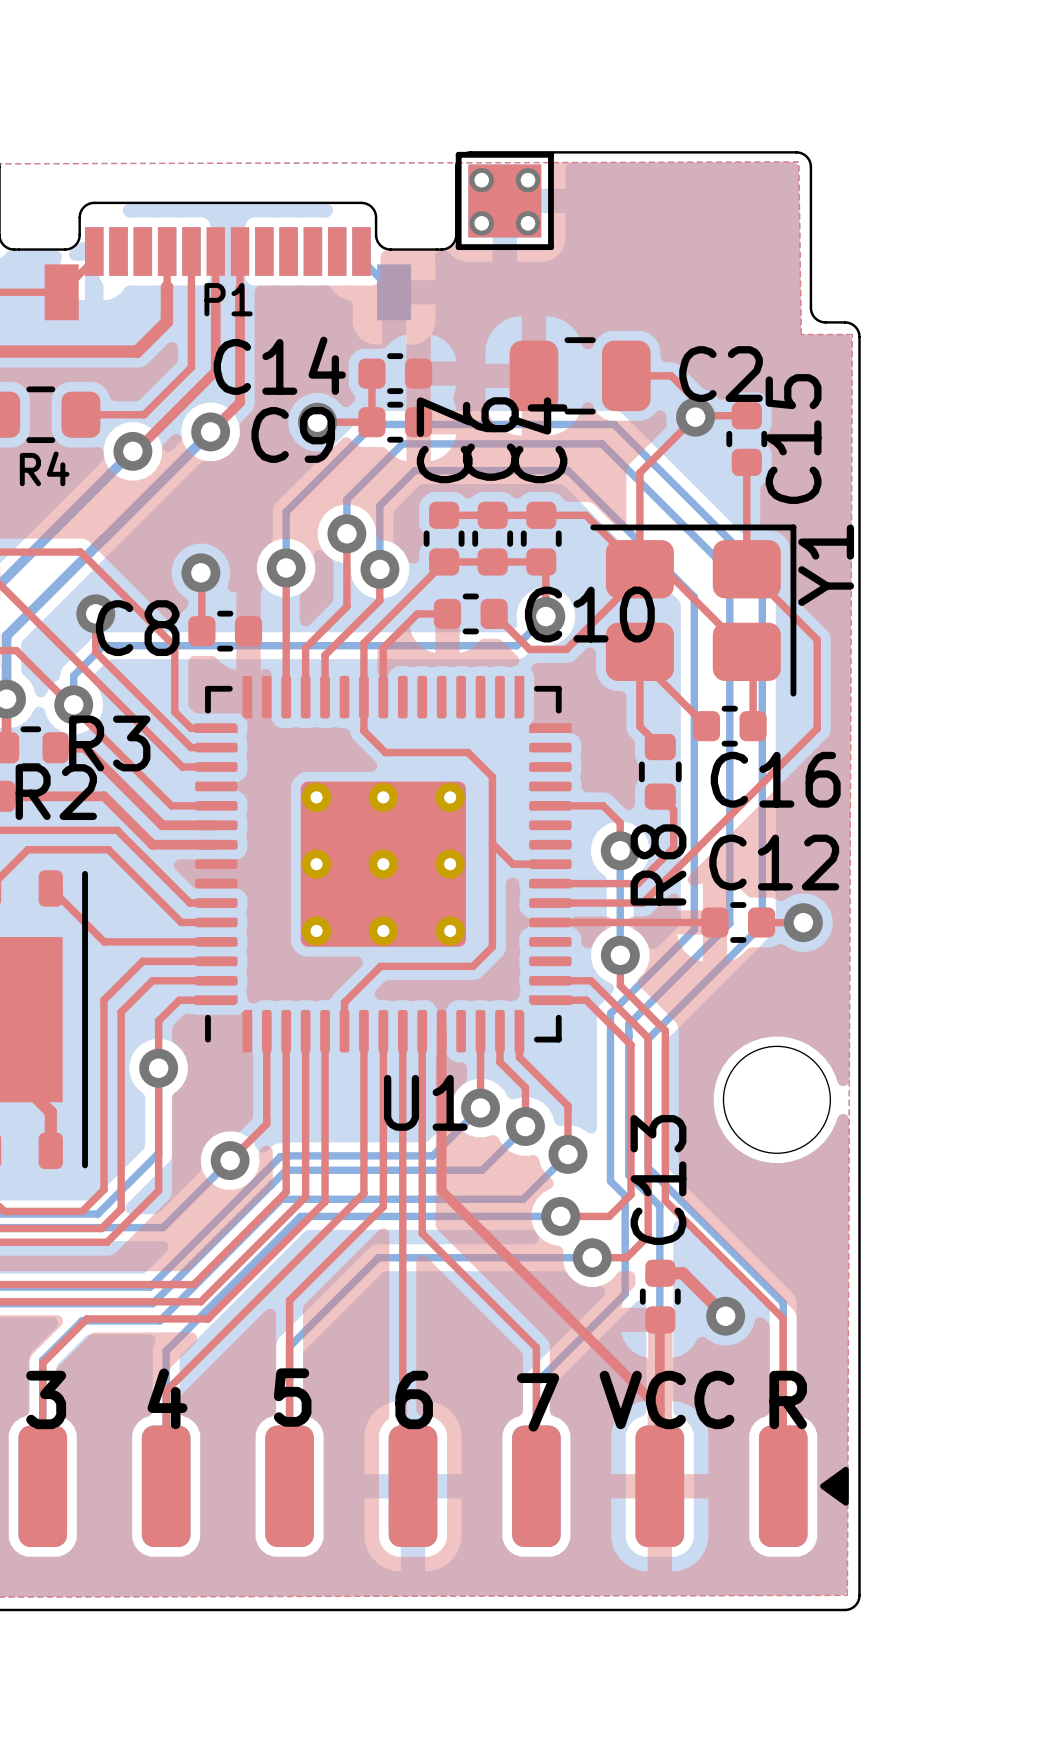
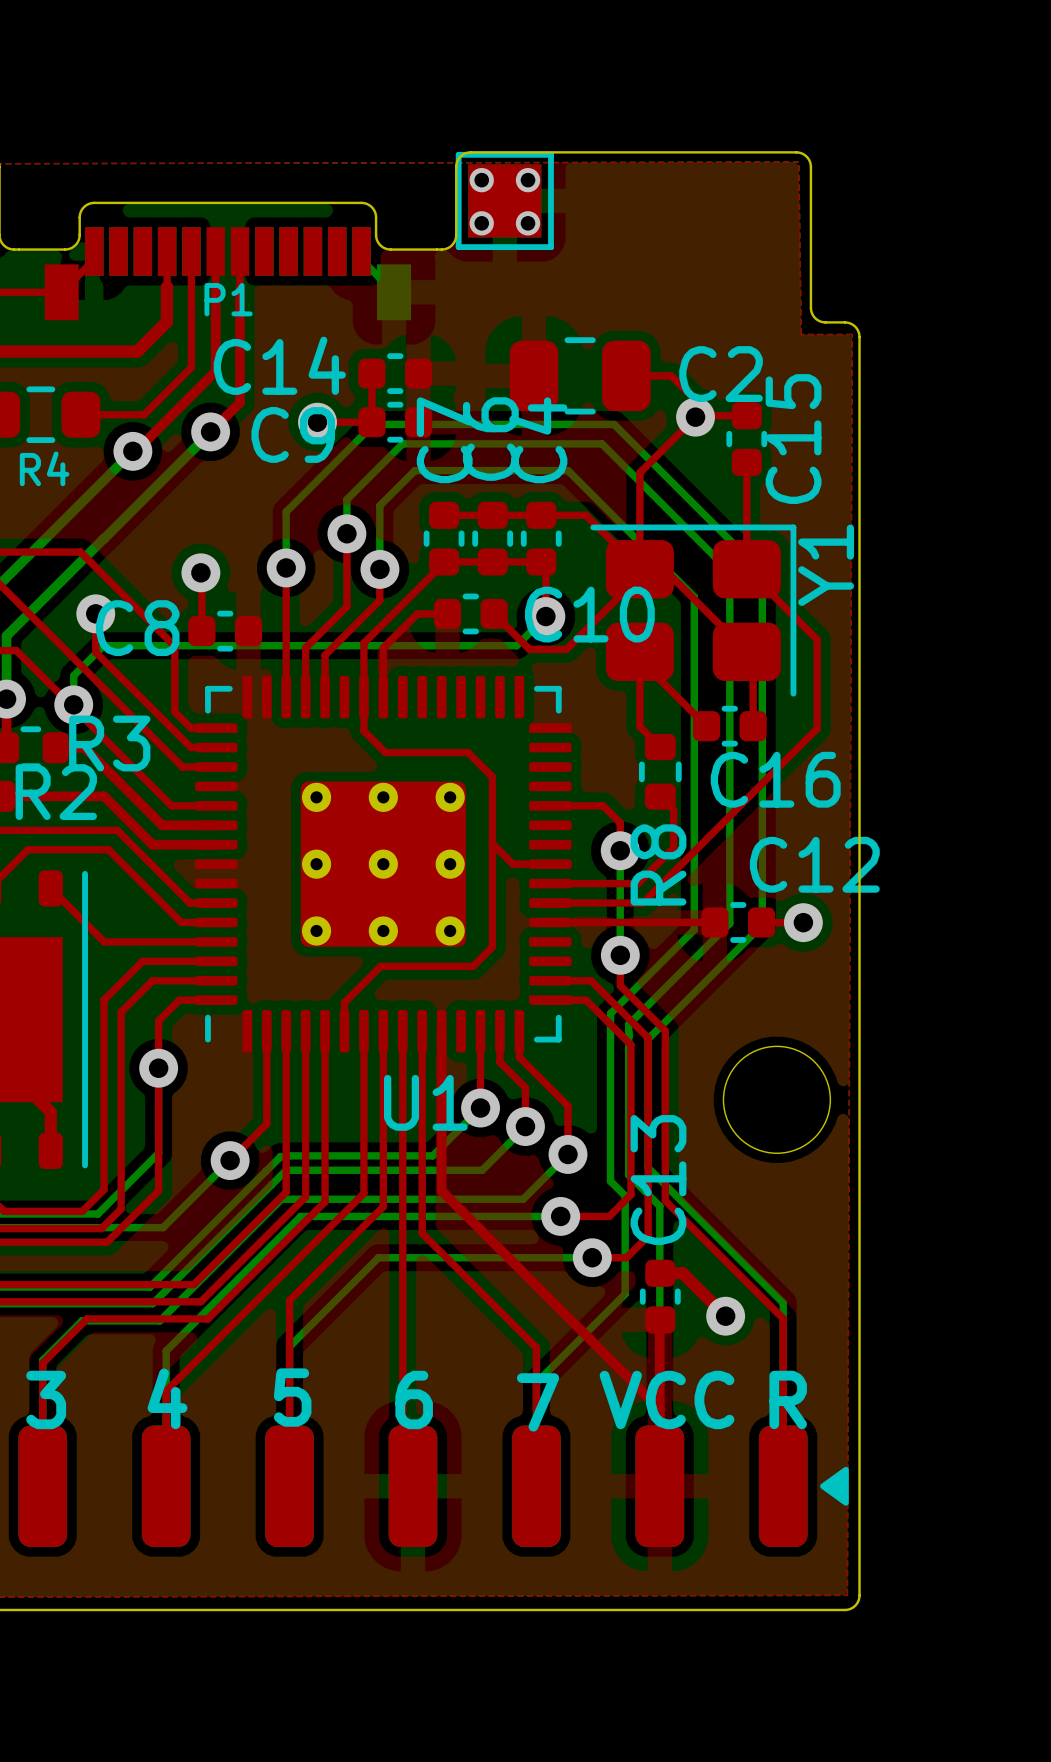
C12 name position: C12 (774, 862) -> C12 (814, 864)

